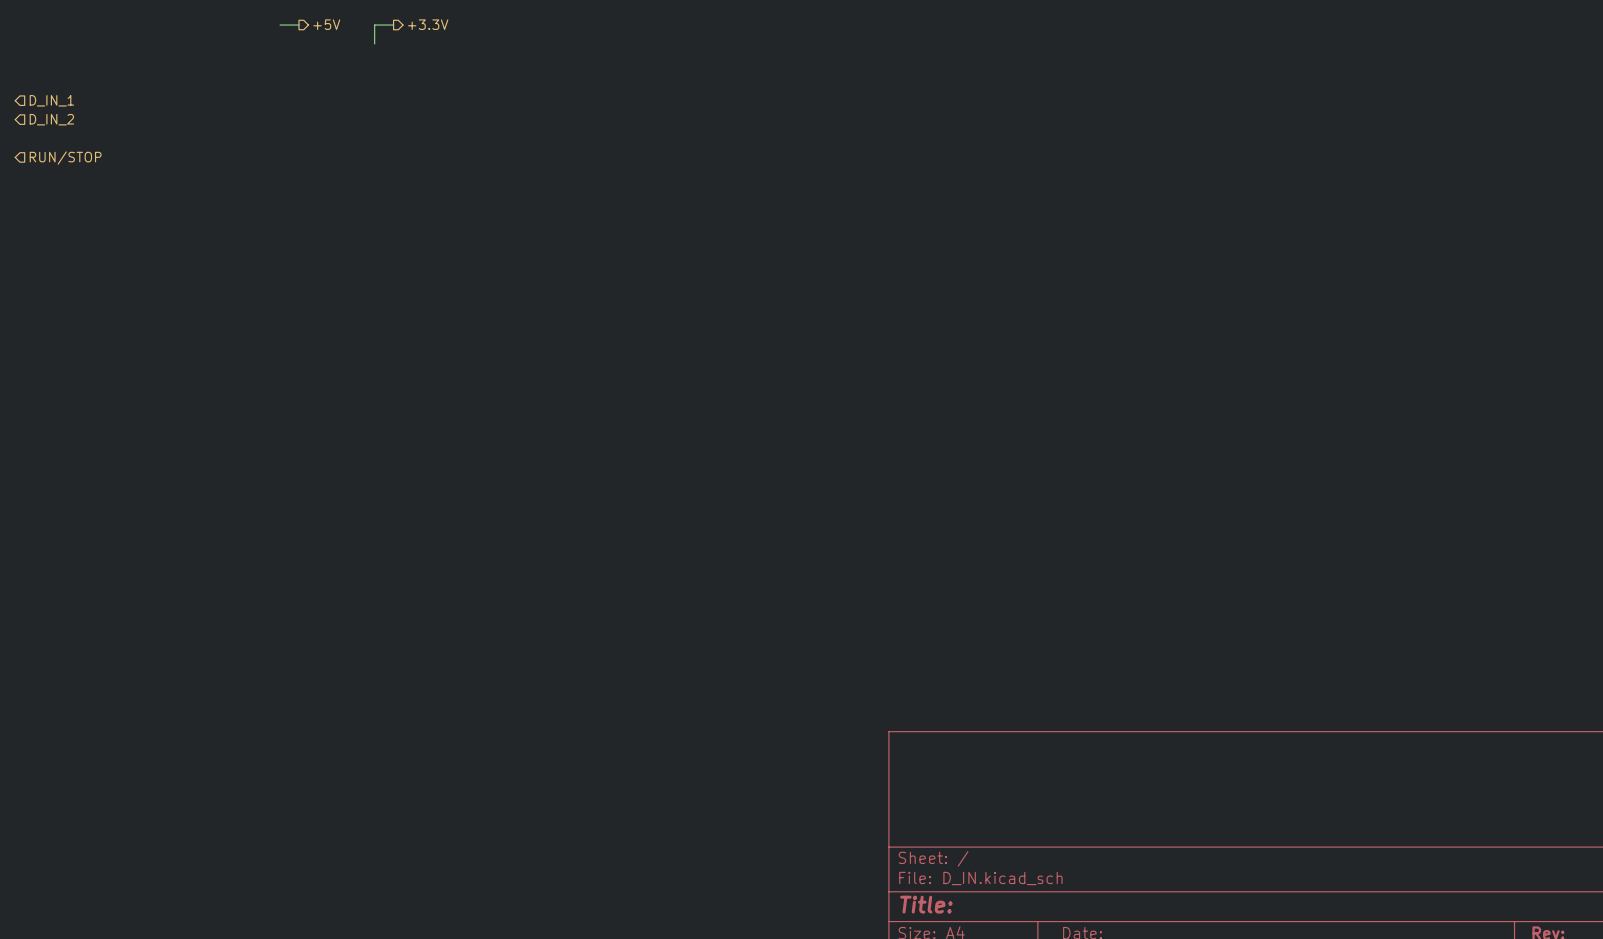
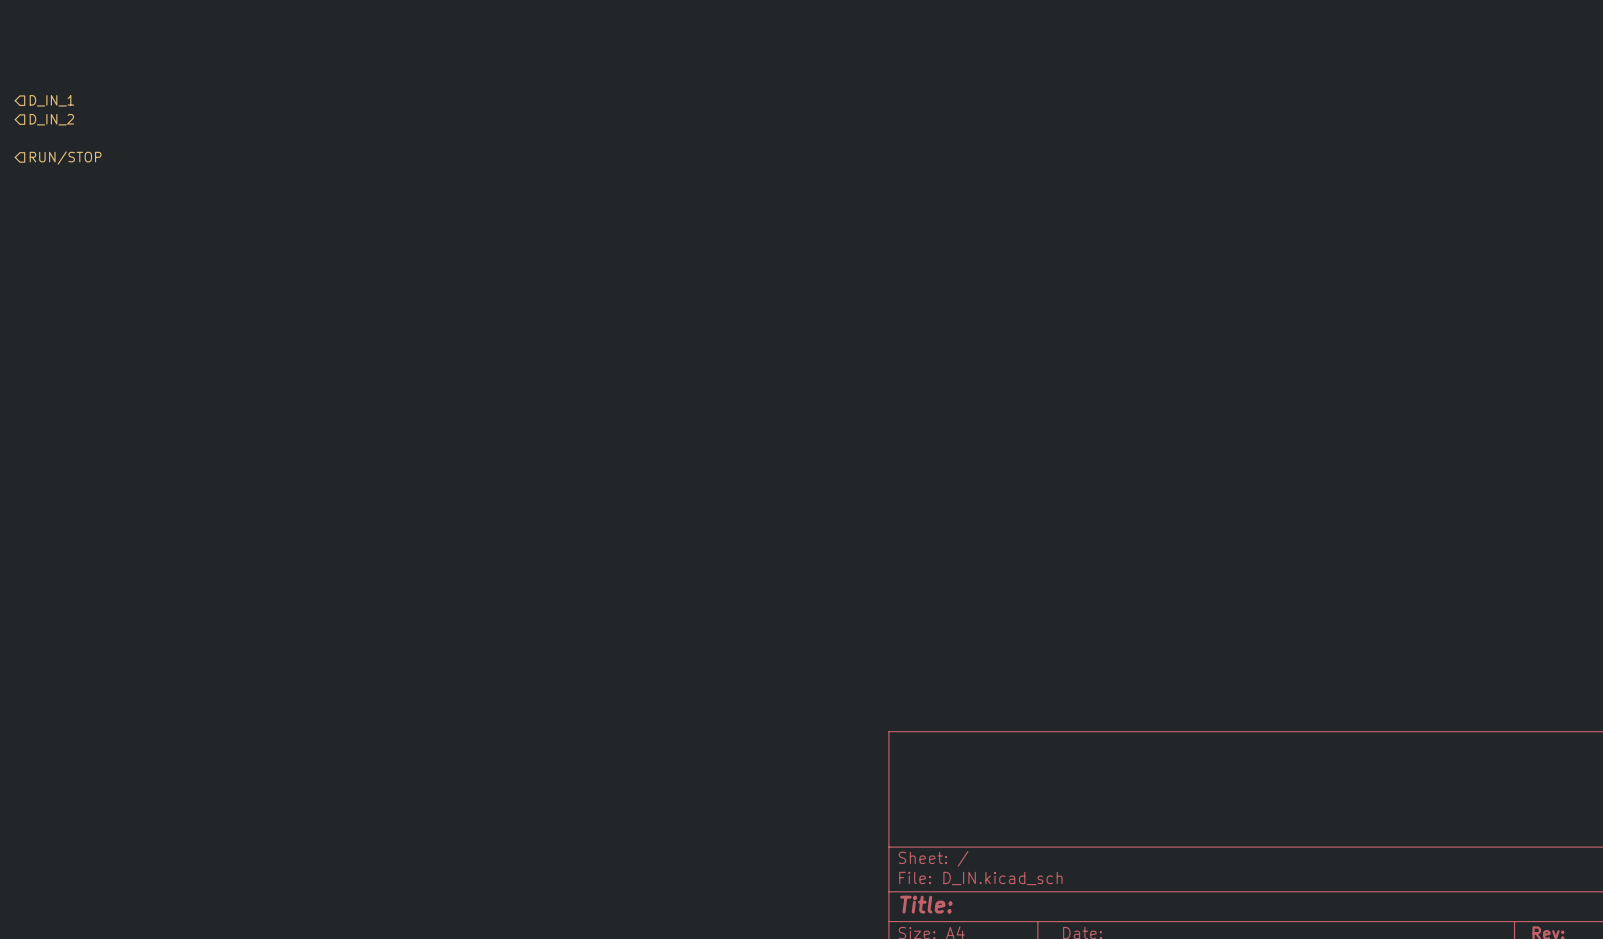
hierarchical label: +5V (326, 24) -> none
hierarchical label: +3.3V (428, 24) -> none
wire: (280, 25) (298, 25) -> none
wire: (393, 25) (374, 25) (374, 43) -> none

